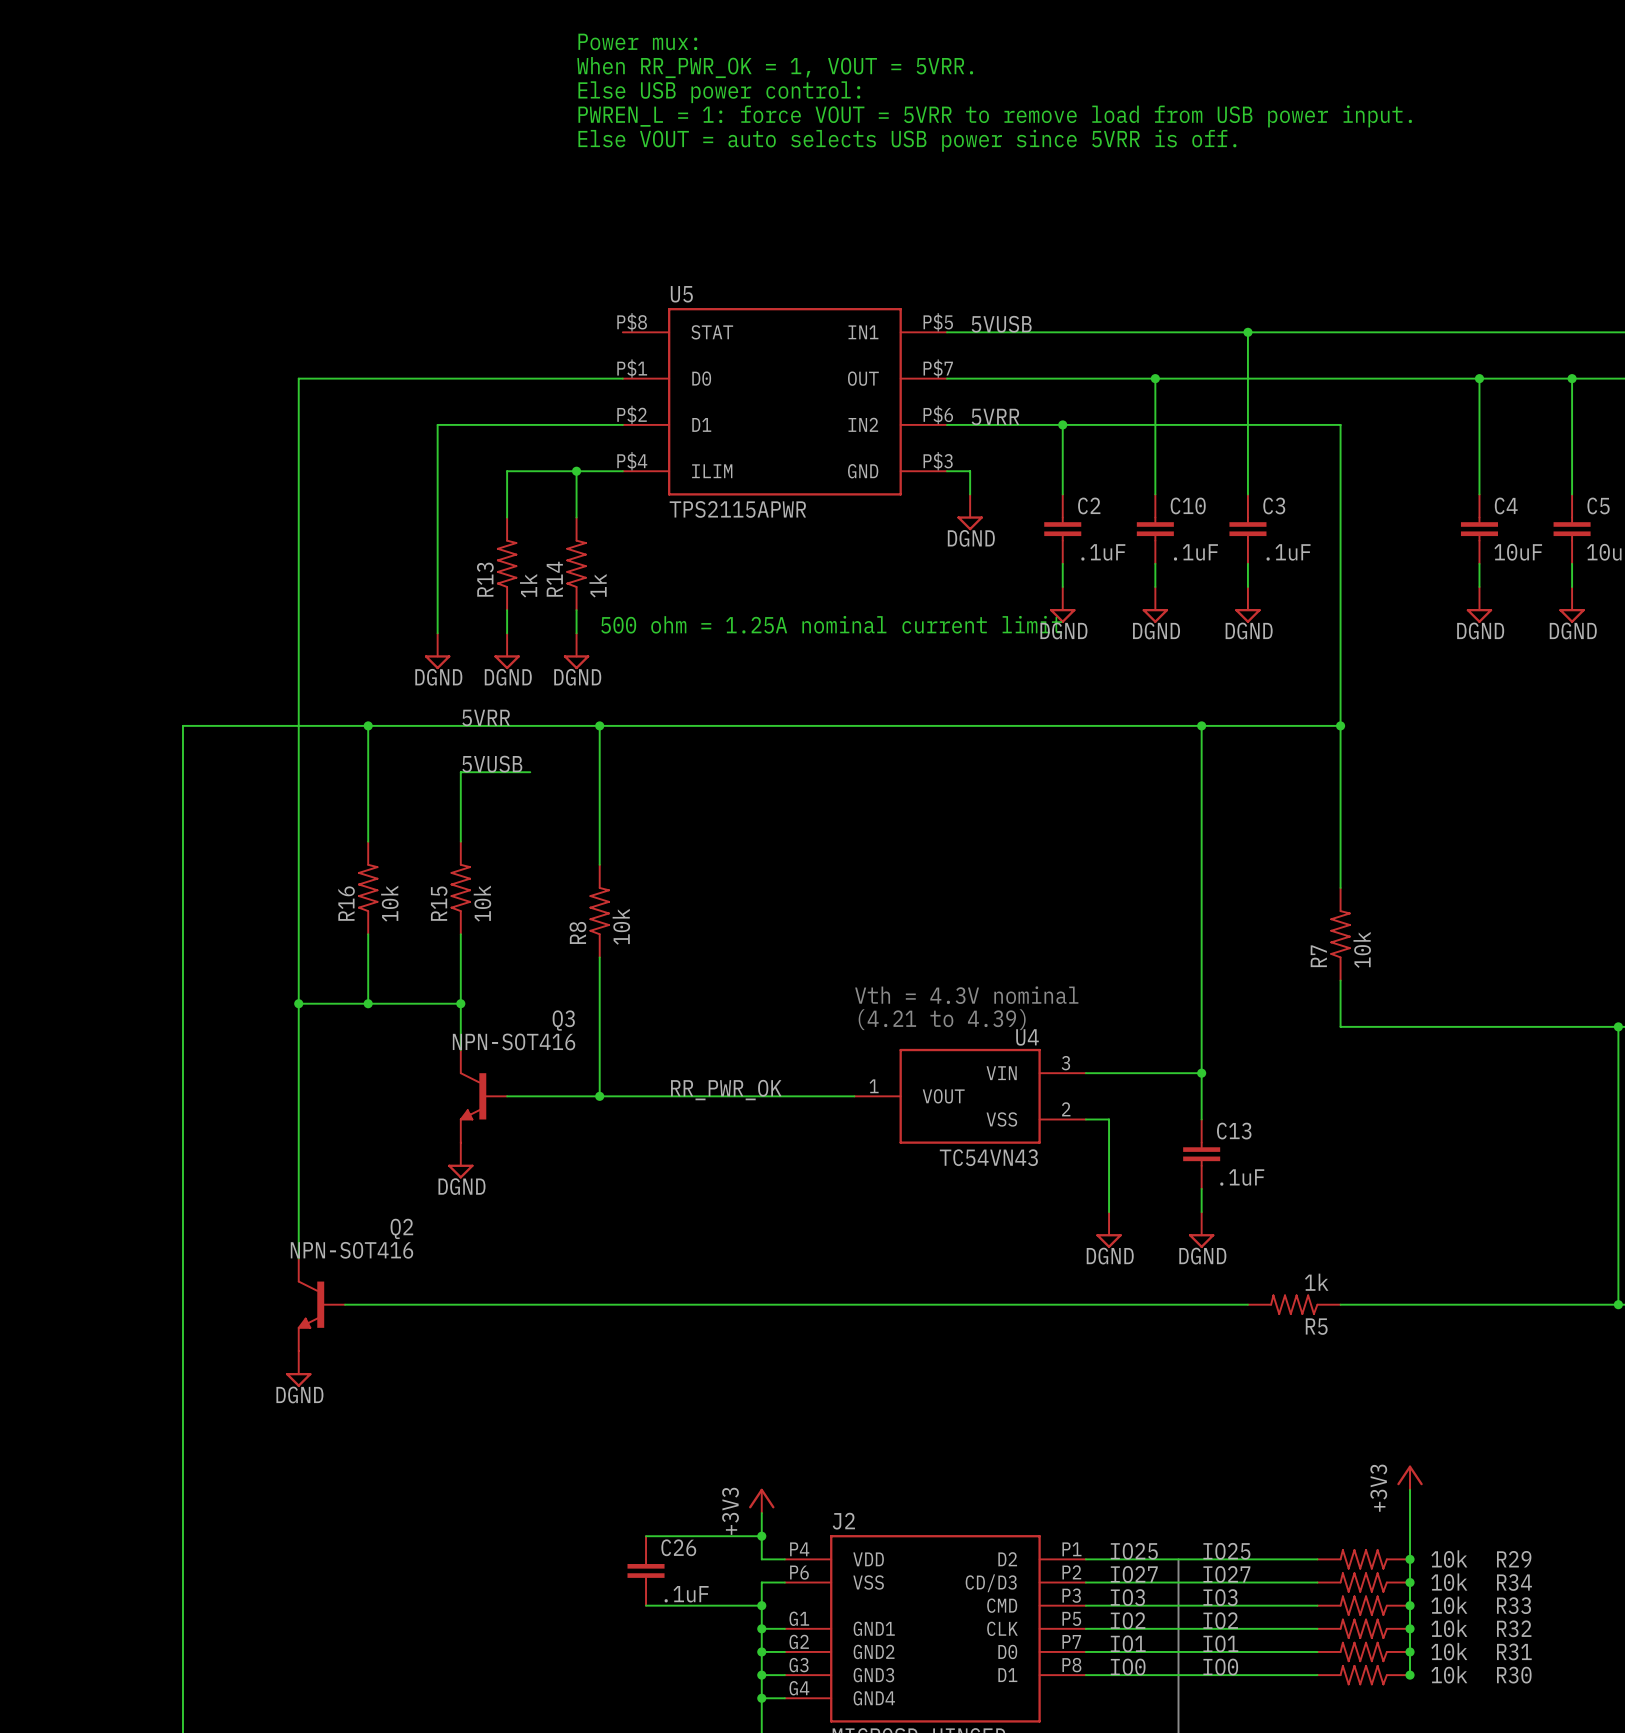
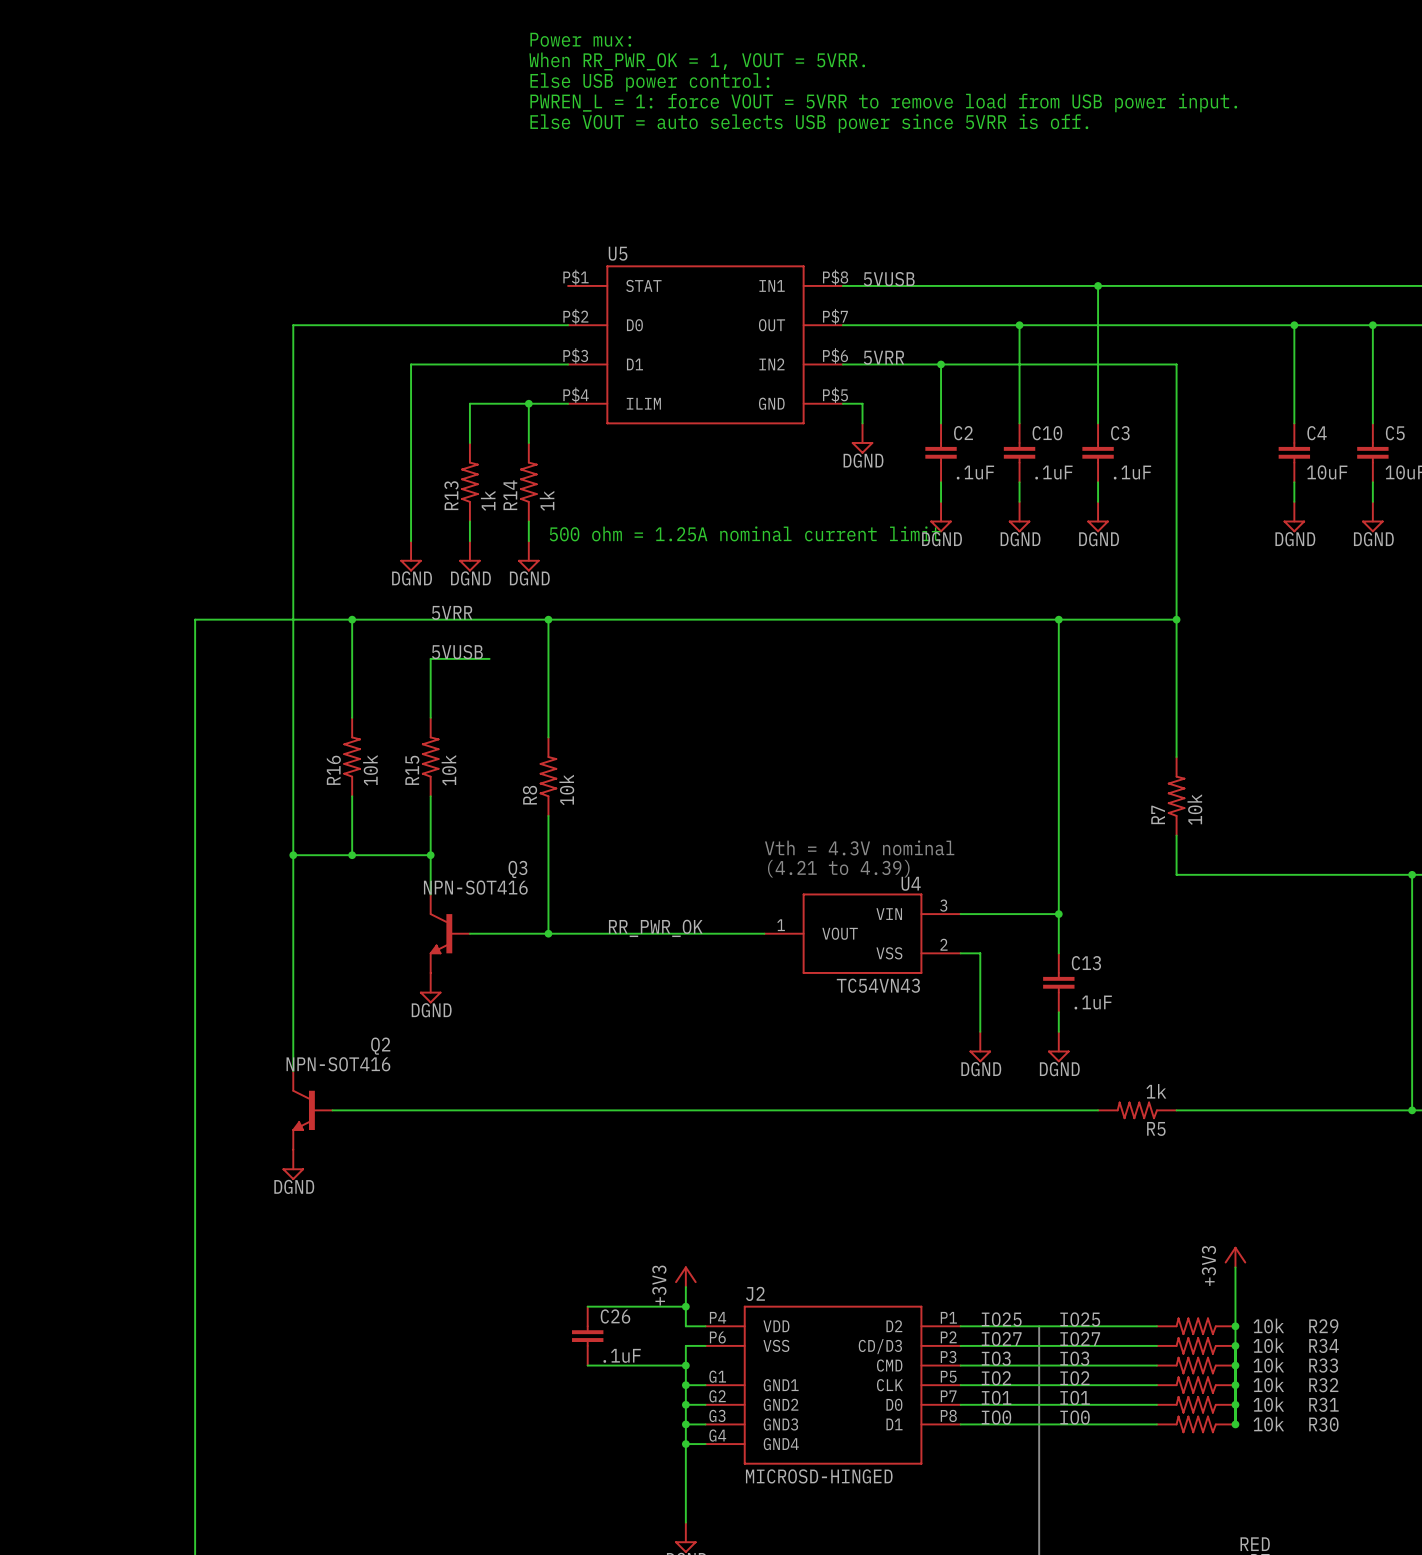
U5 pin number: P$8 (632, 322) -> P$1 (575, 277)
U5 pin number: P$5 (938, 322) -> P$8 (835, 277)
U5 pin number: P$1 (632, 368) -> P$2 (575, 316)
U5 pin number: P$2 (632, 414) -> P$3 (575, 355)
U5 pin number: P$3 (938, 461) -> P$5 (835, 395)
U5 value: TPS2115APWR (737, 509) -> none

